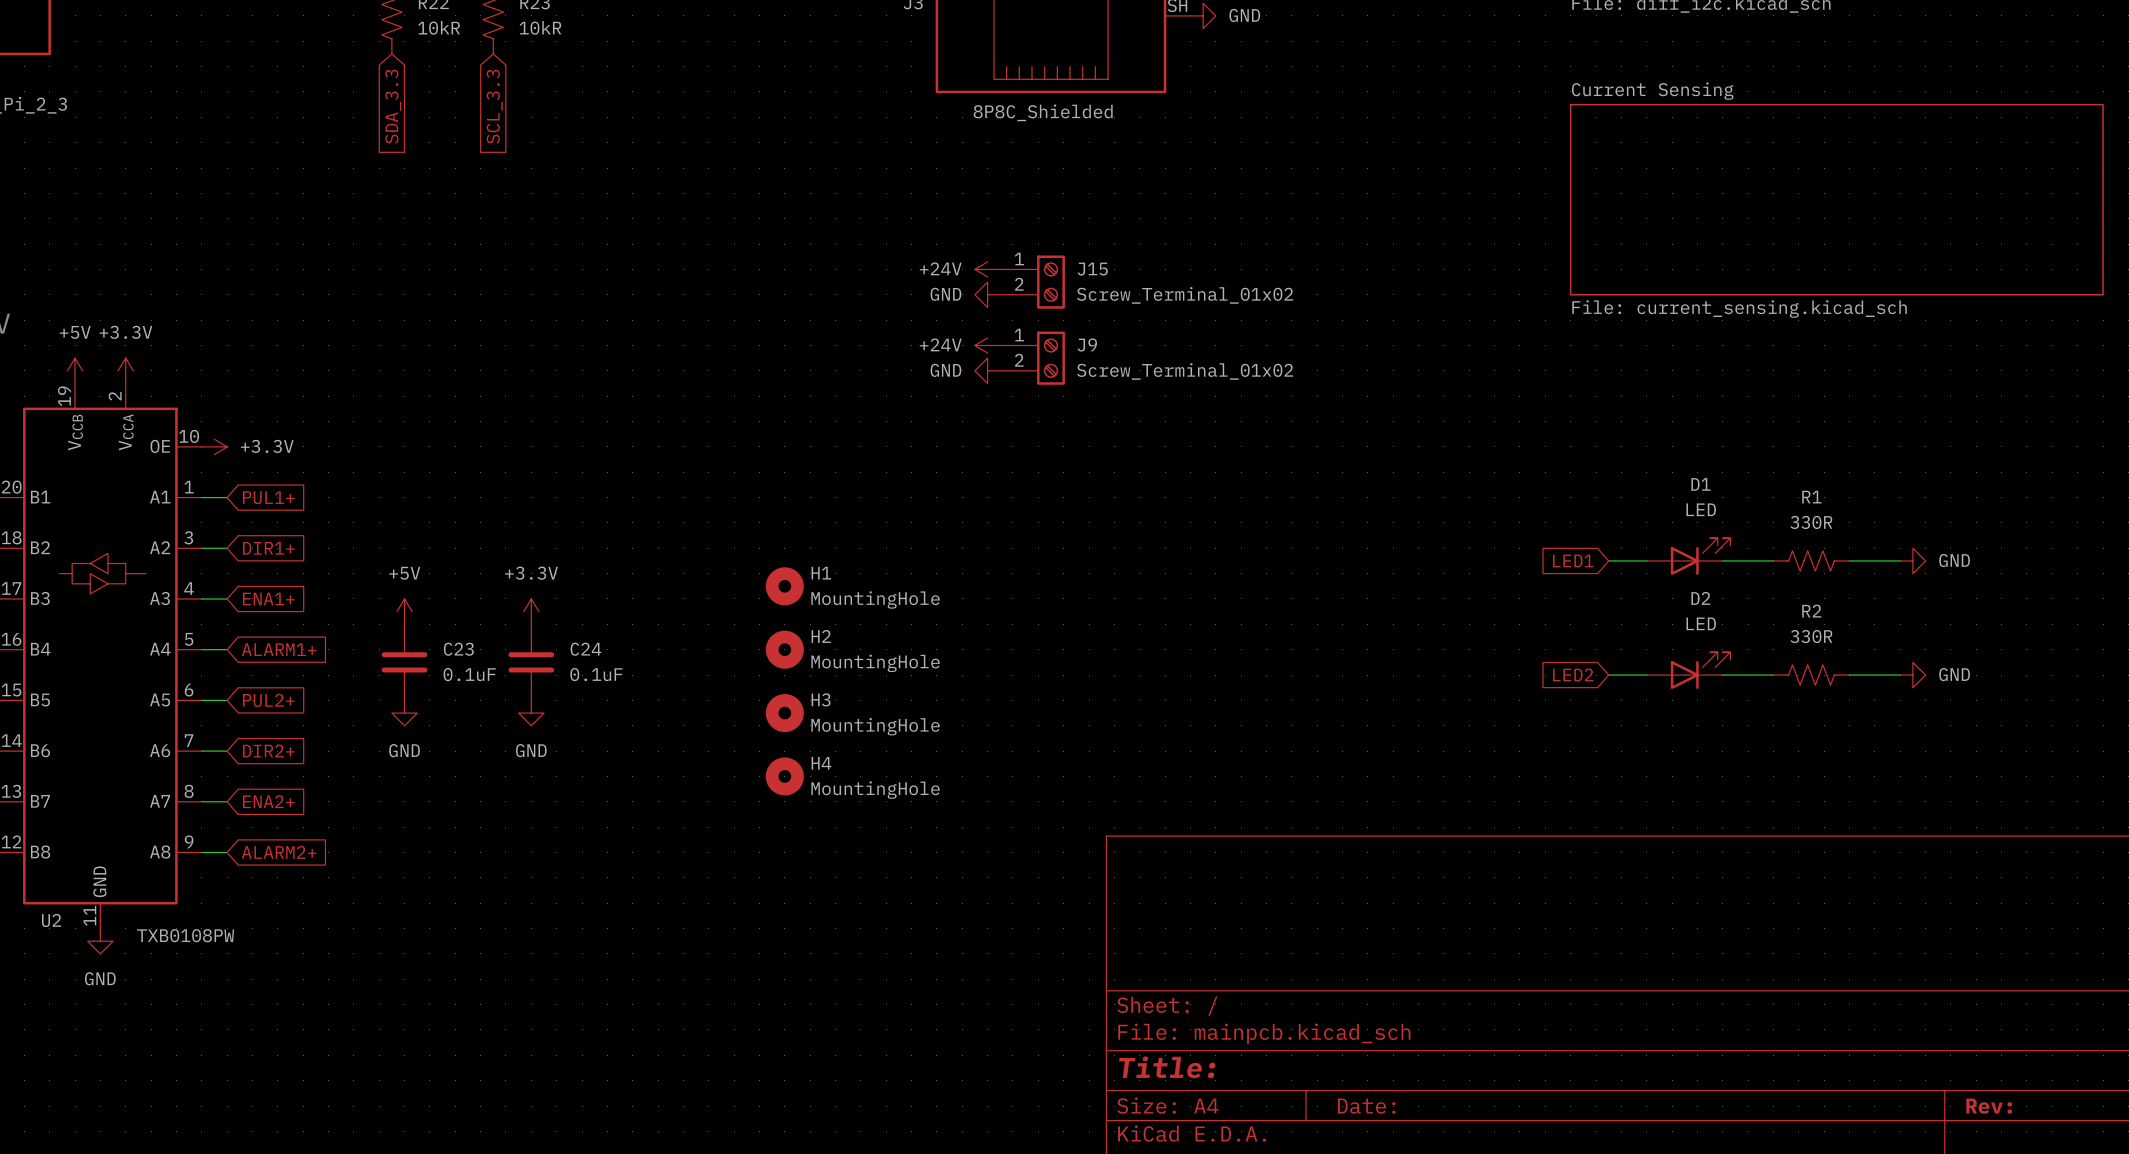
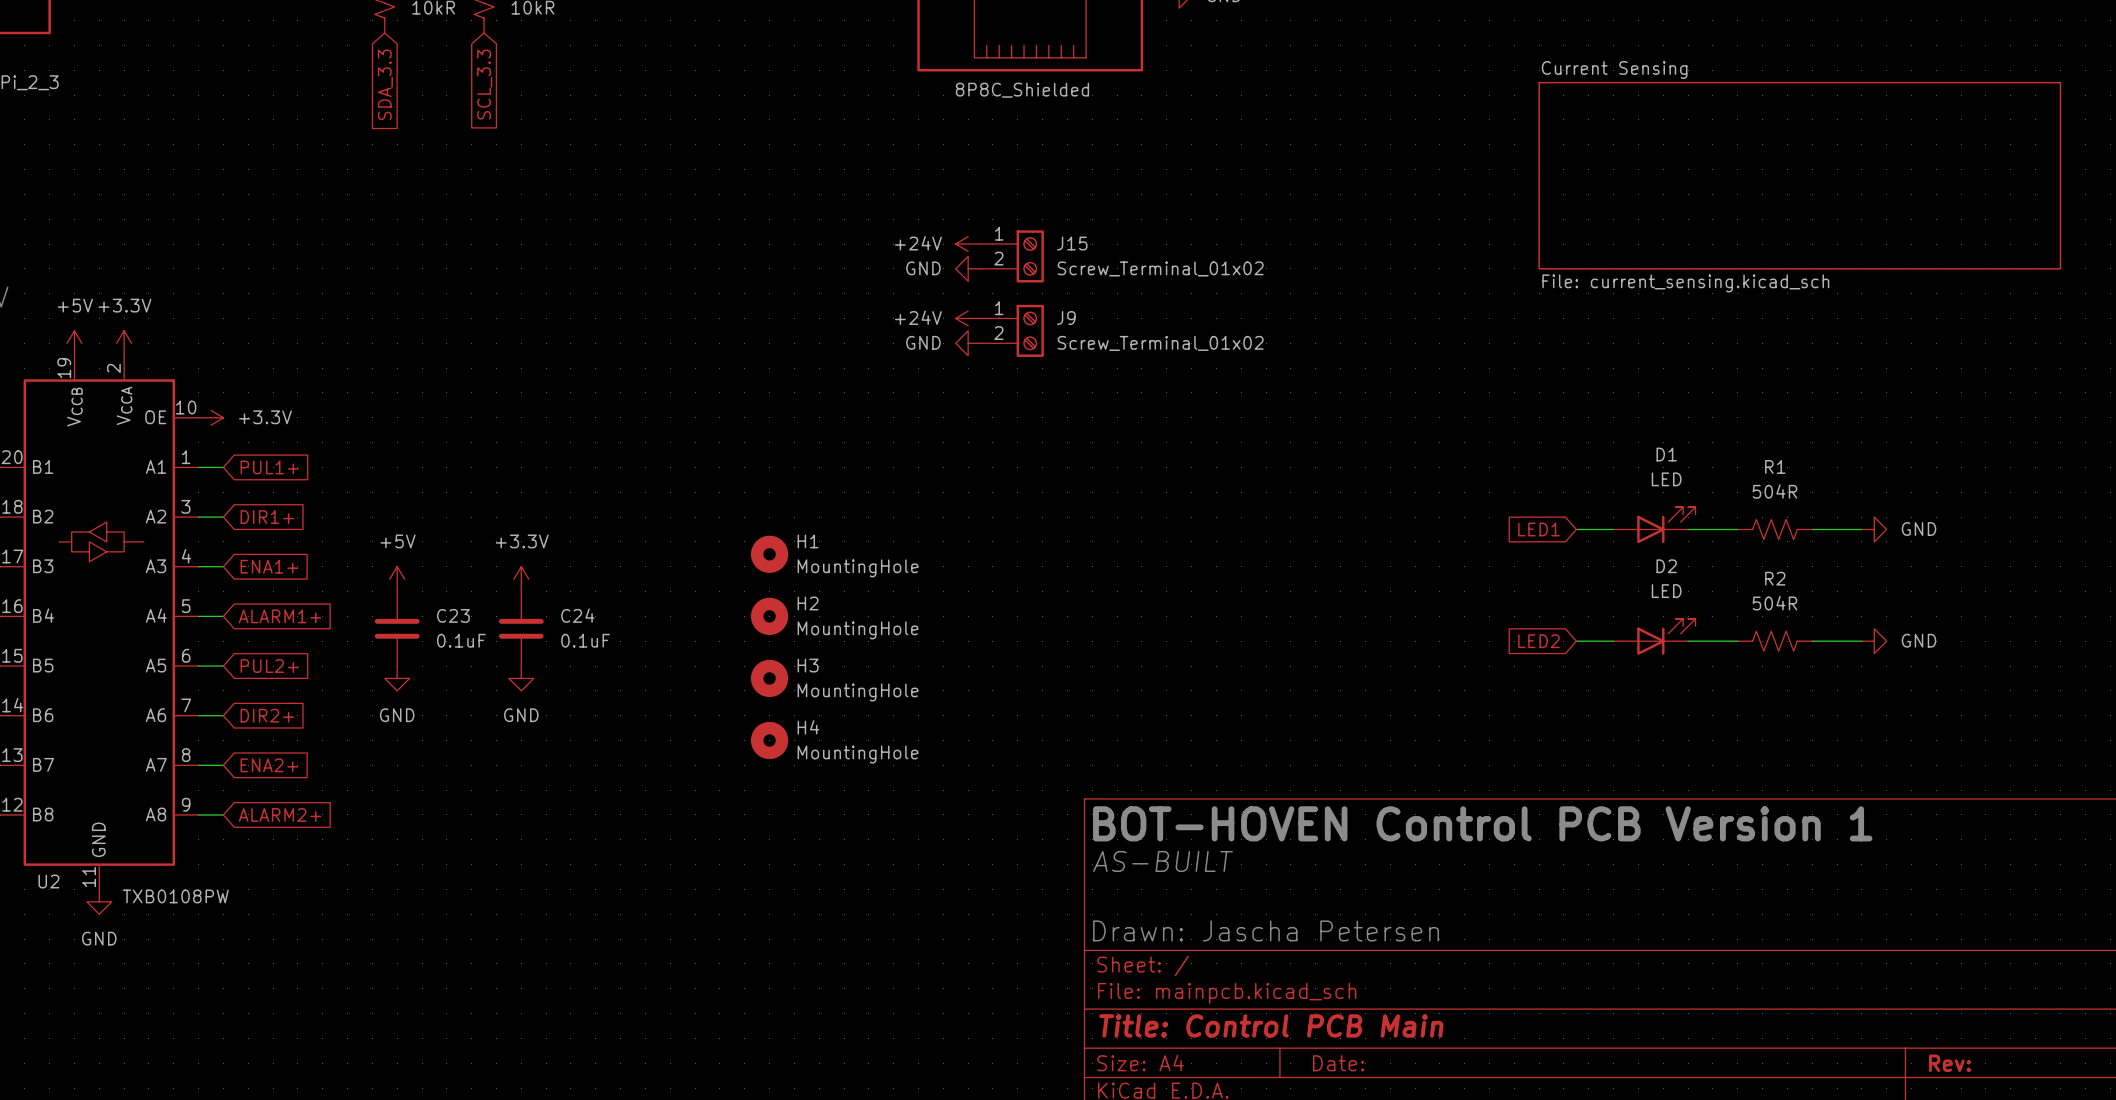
R1 value: 330R (1811, 522) -> 504R (1774, 491)
R2 value: 330R (1811, 636) -> 504R (1774, 603)
text: none -> BOT-HOVEN Control PCB Version 1 (1482, 823)
text: none -> AS-BUILT (1163, 861)
text: none -> Drawn: Jascha Petersen (1266, 930)
title block: Title: (1167, 1067) -> Title: Control PCB Main (1271, 1025)

